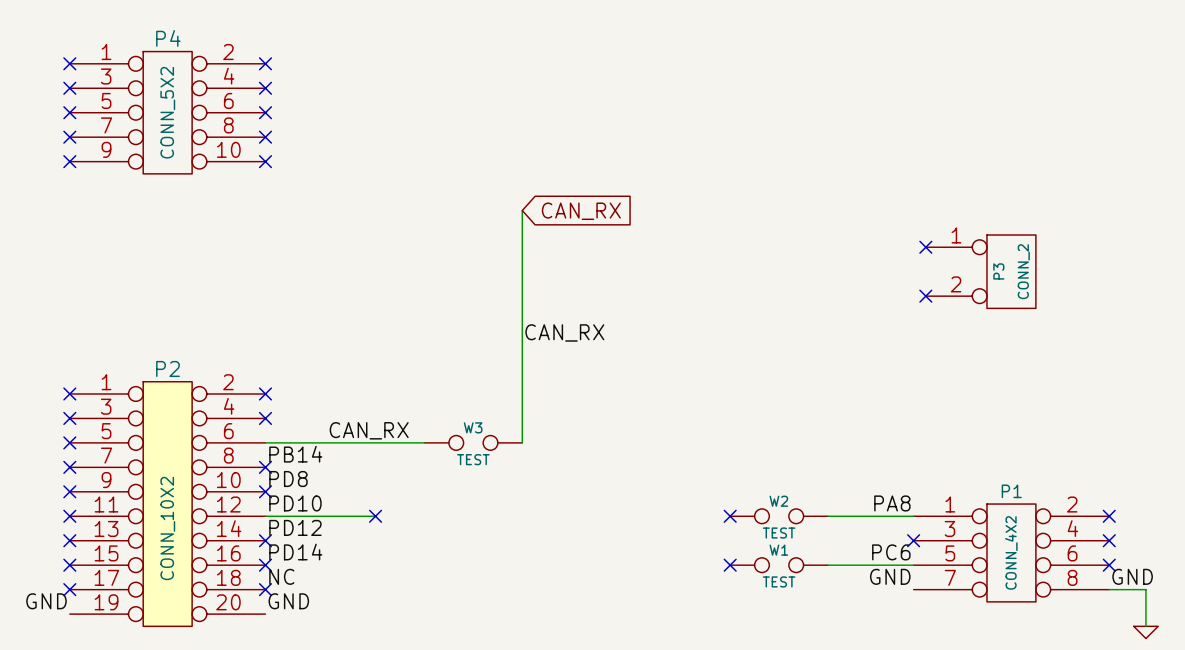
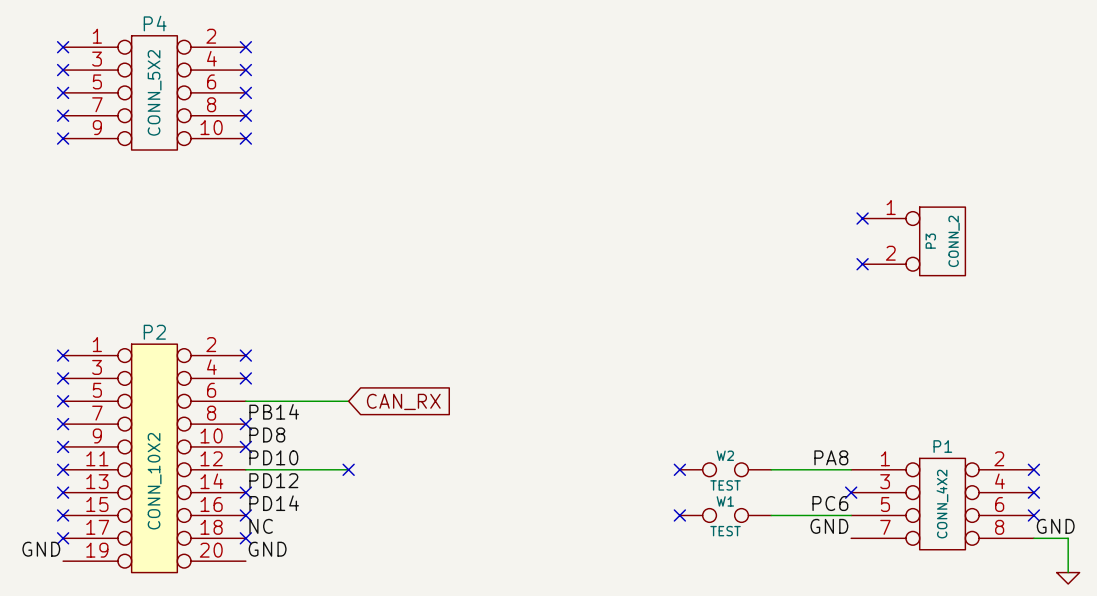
wire: (522, 210) (522, 442) -> none
global label: CAN_RX (581, 211) -> none
label: CAN_RX (564, 332) -> none
label: CAN_RX (369, 430) -> none
wire: (375, 442) (424, 442) -> none
W3: TEST (473, 442) -> none
global label: none -> CAN_RX (403, 401)

